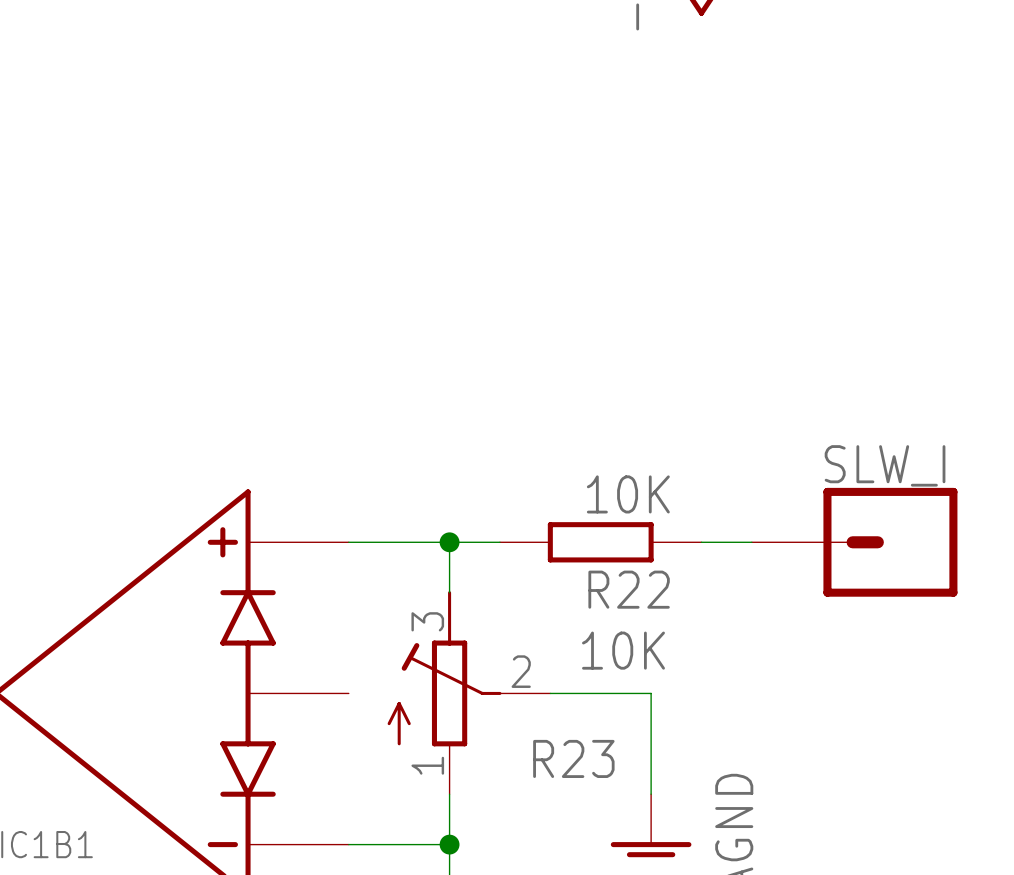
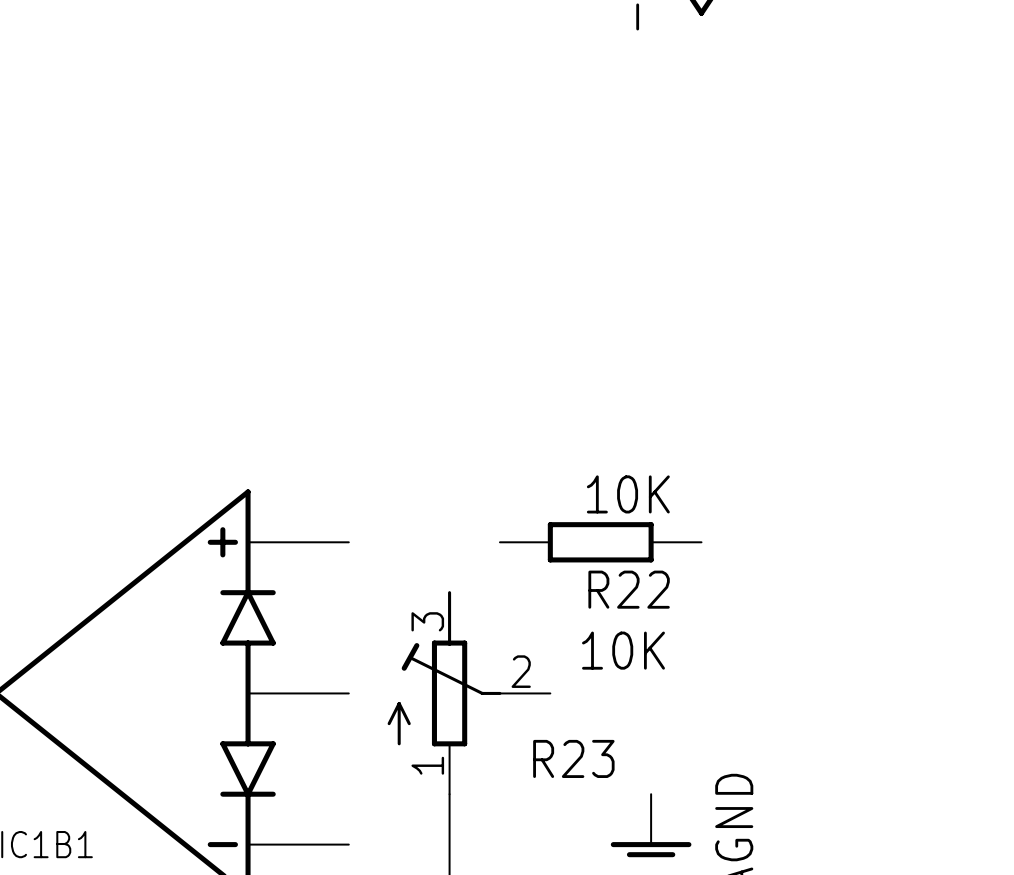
wire: (348, 542) (499, 542) -> none
wire: (449, 542) (449, 592) -> none
junction: (449, 542) -> none
wire: (701, 542) (751, 542) -> none
SLW_I: (854, 542) -> none
wire: (550, 693) (651, 693) (651, 794) -> none
wire: (348, 844) (449, 844) -> none
junction: (449, 844) -> none

